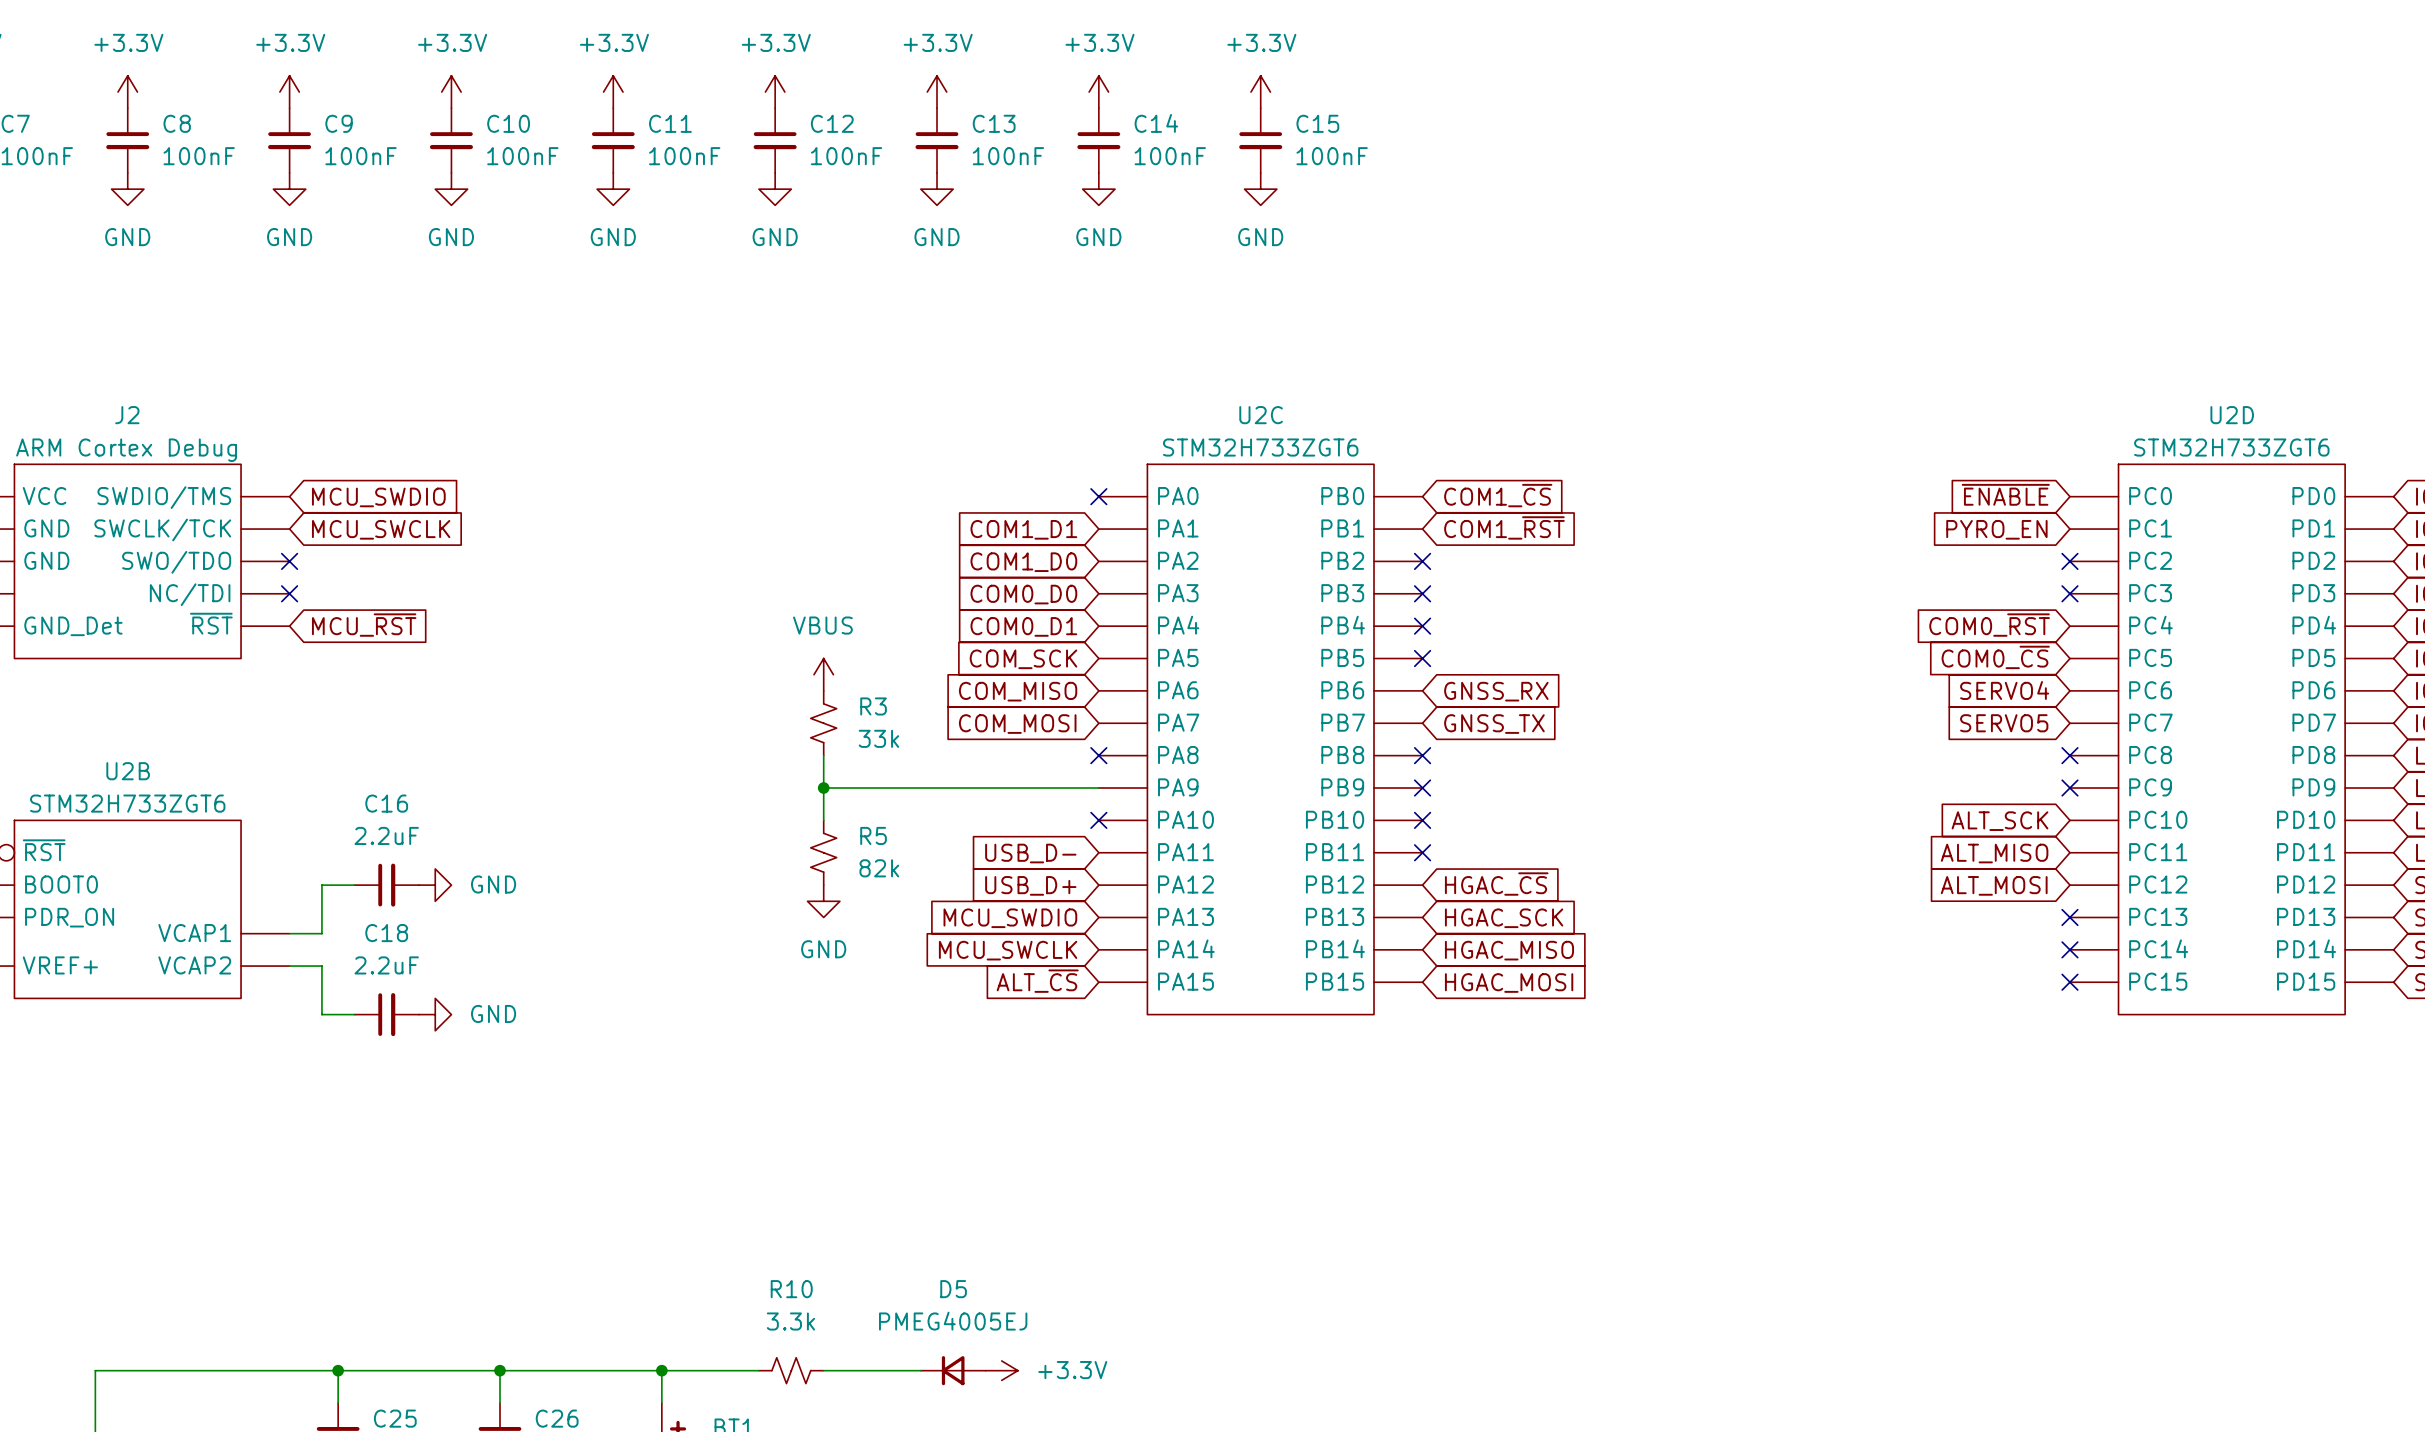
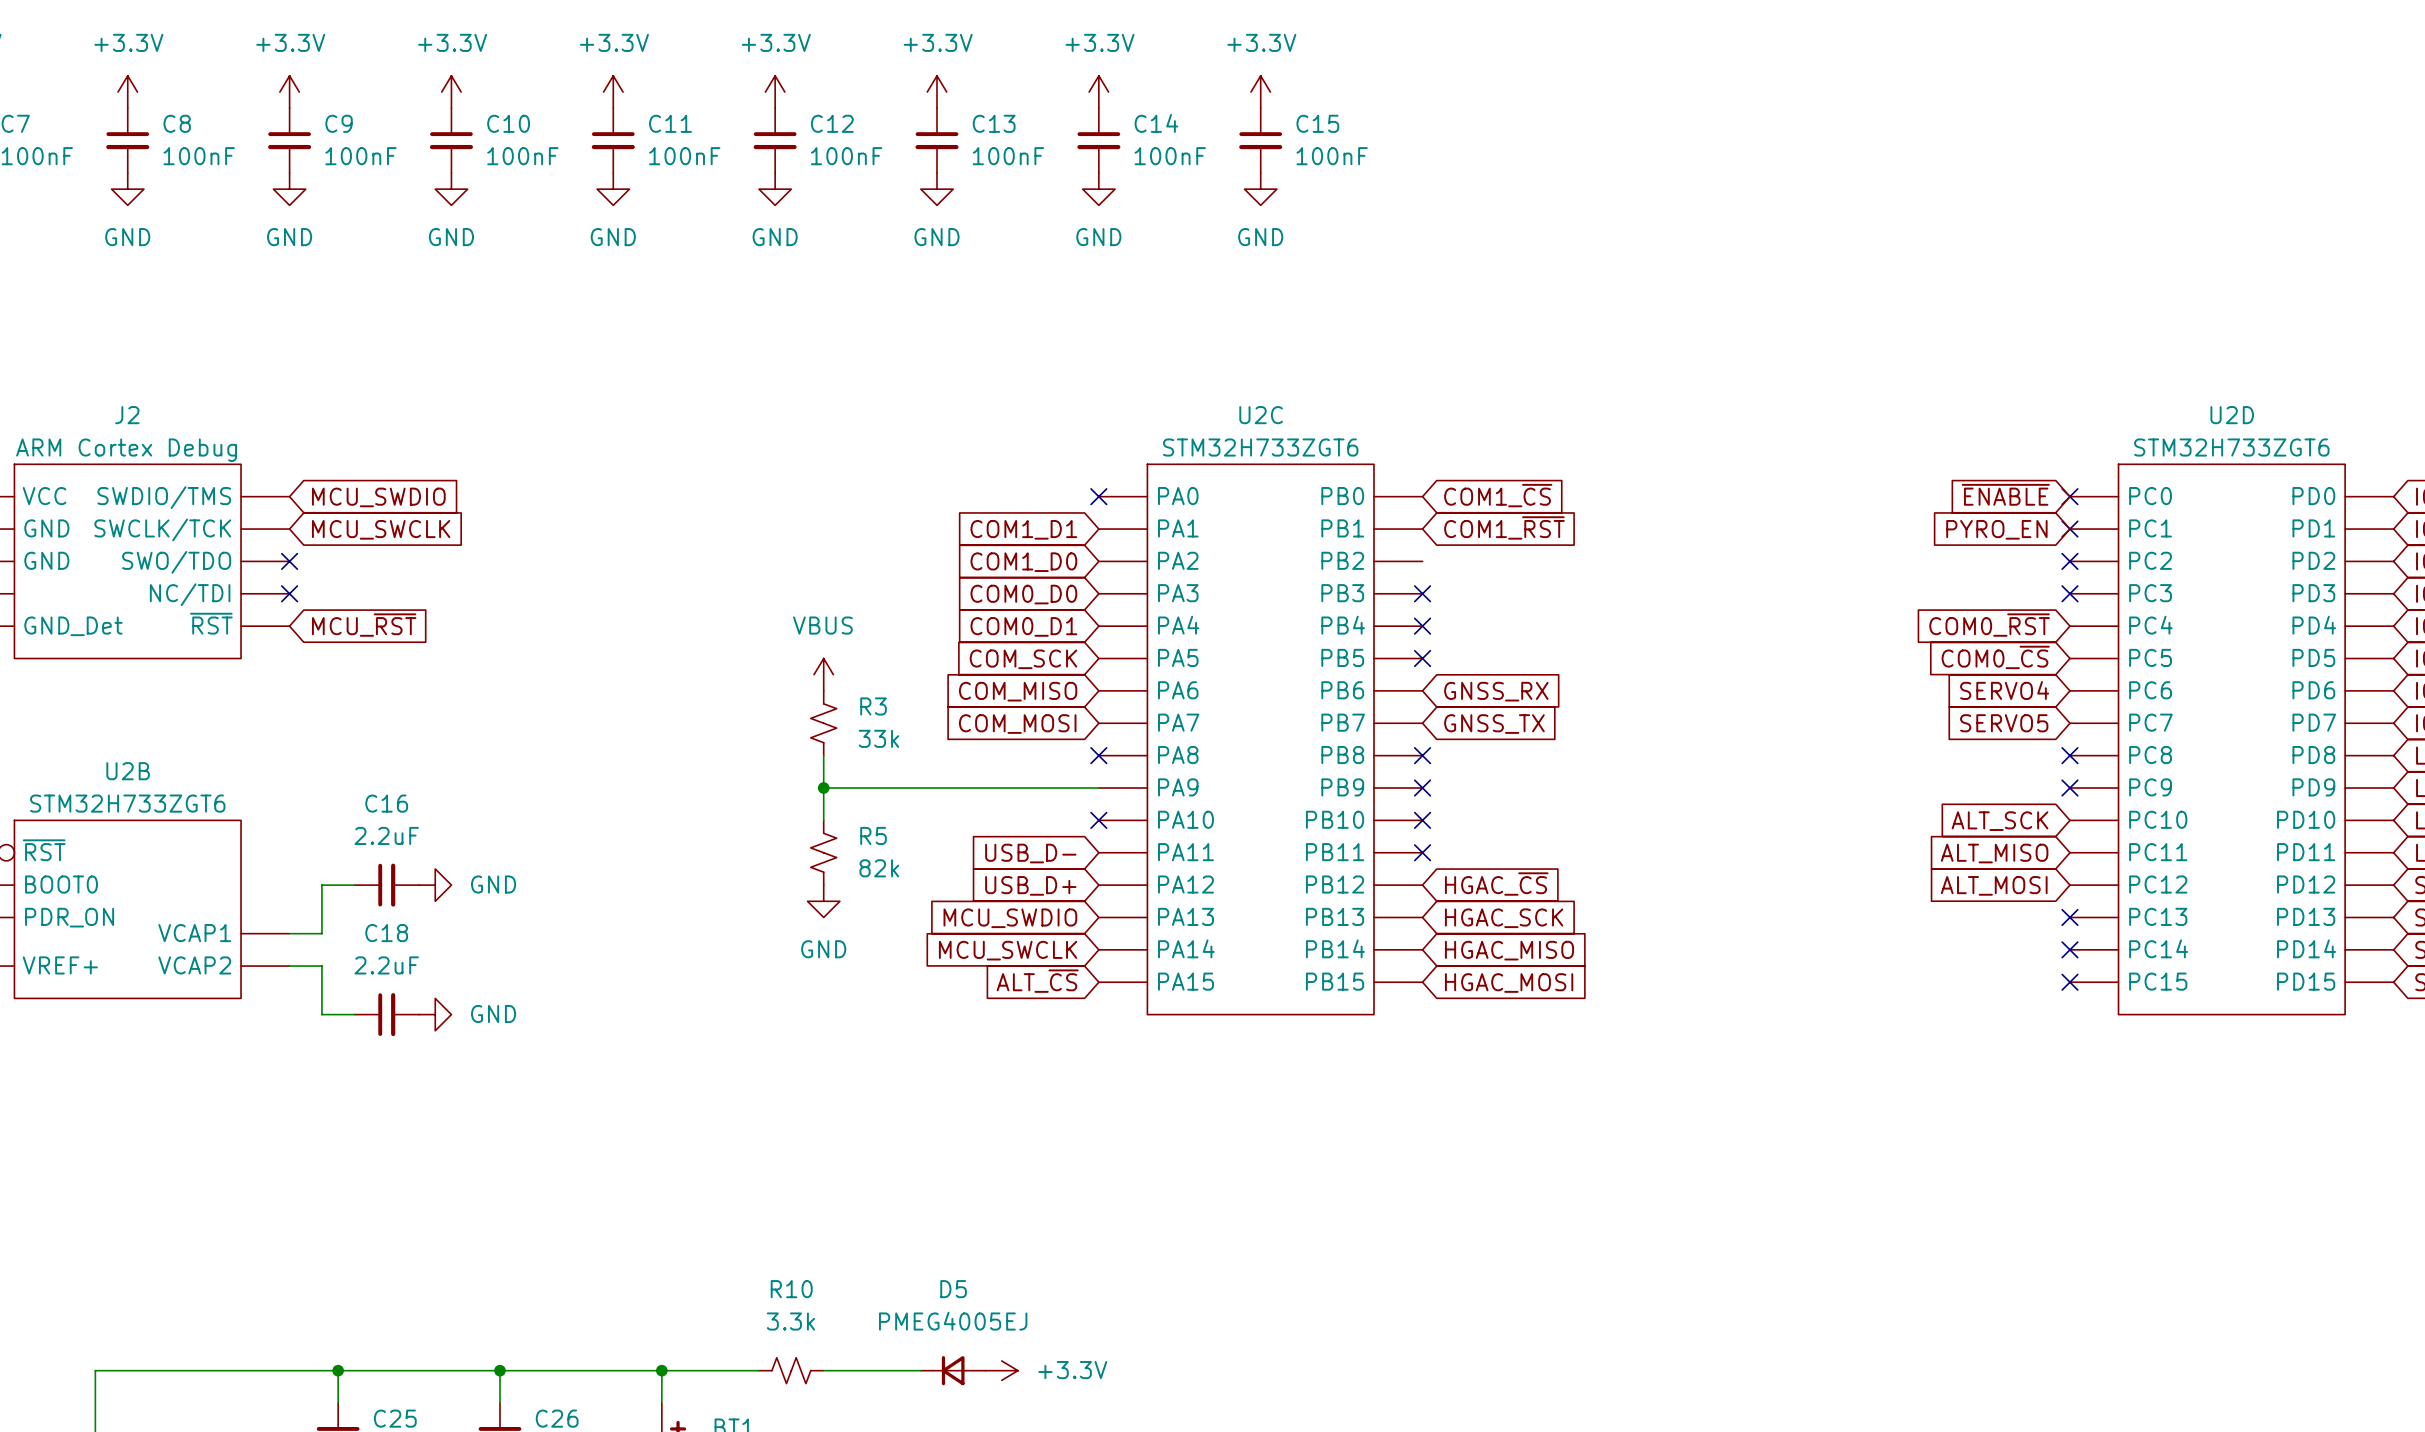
no-connect mark: none -> (2069, 496)
no-connect mark: none -> (2069, 529)
no-connect mark: (1422, 561) -> none

